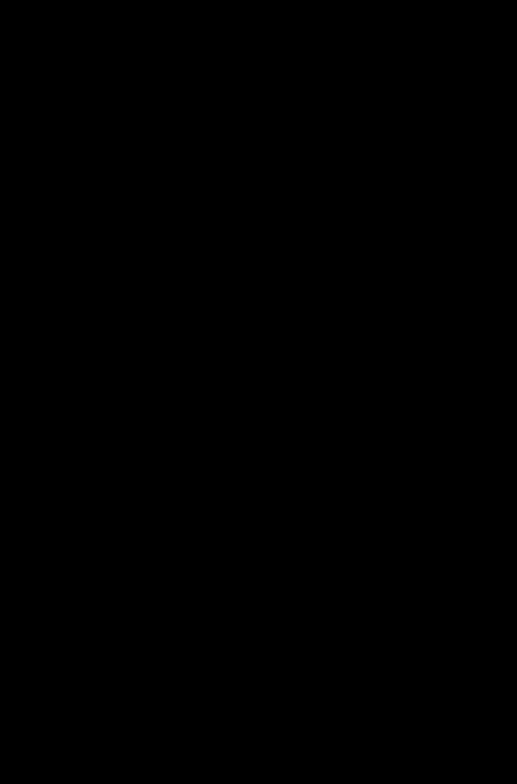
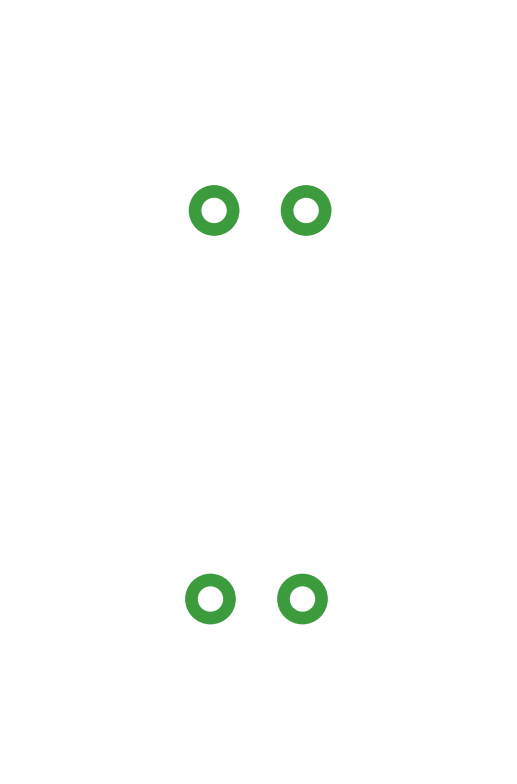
part: none -> (260, 210)
part: none -> (256, 599)

